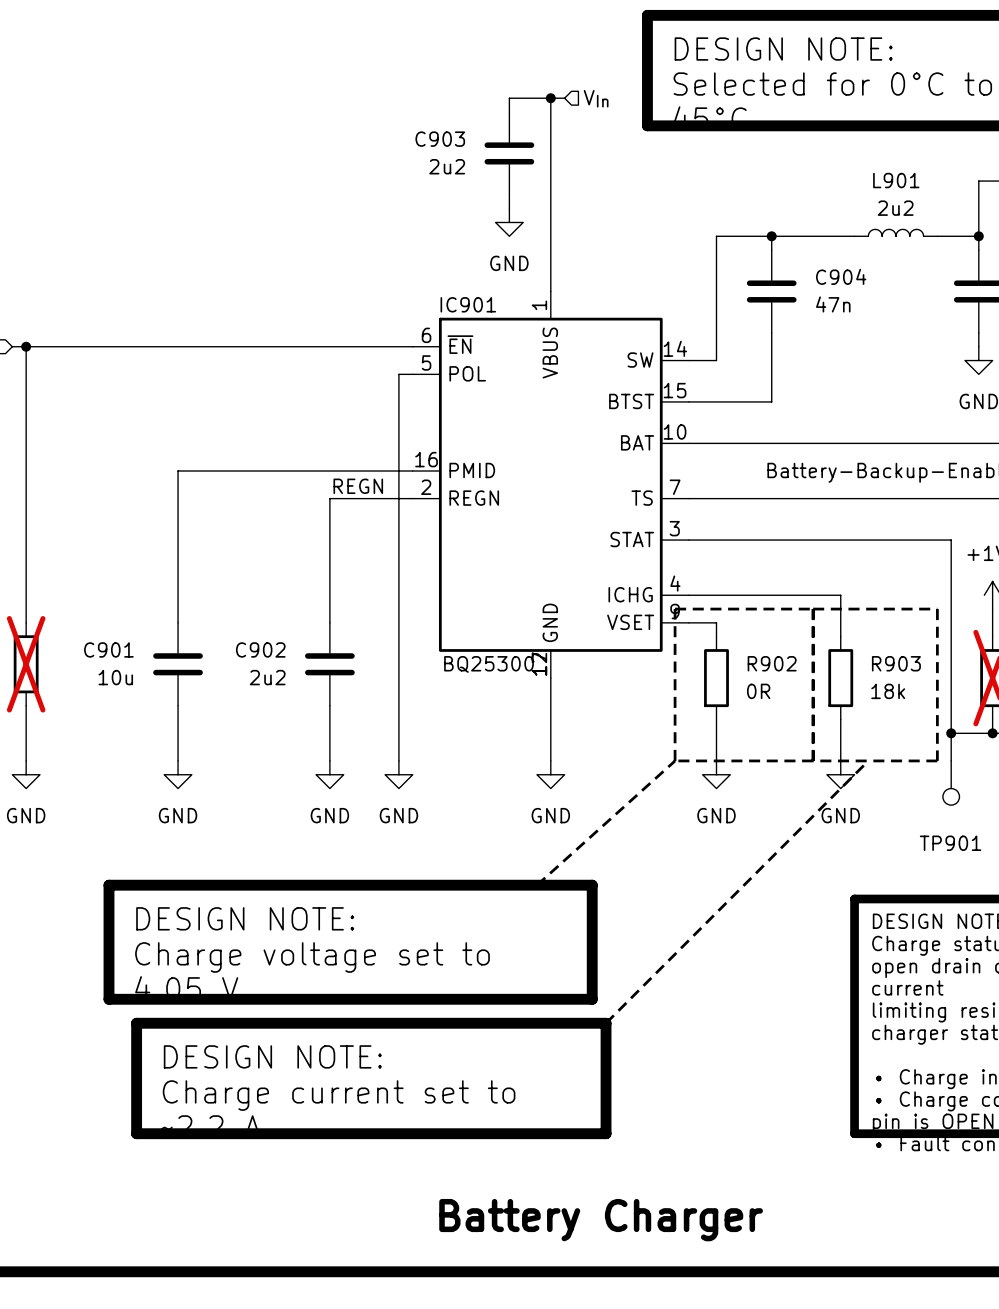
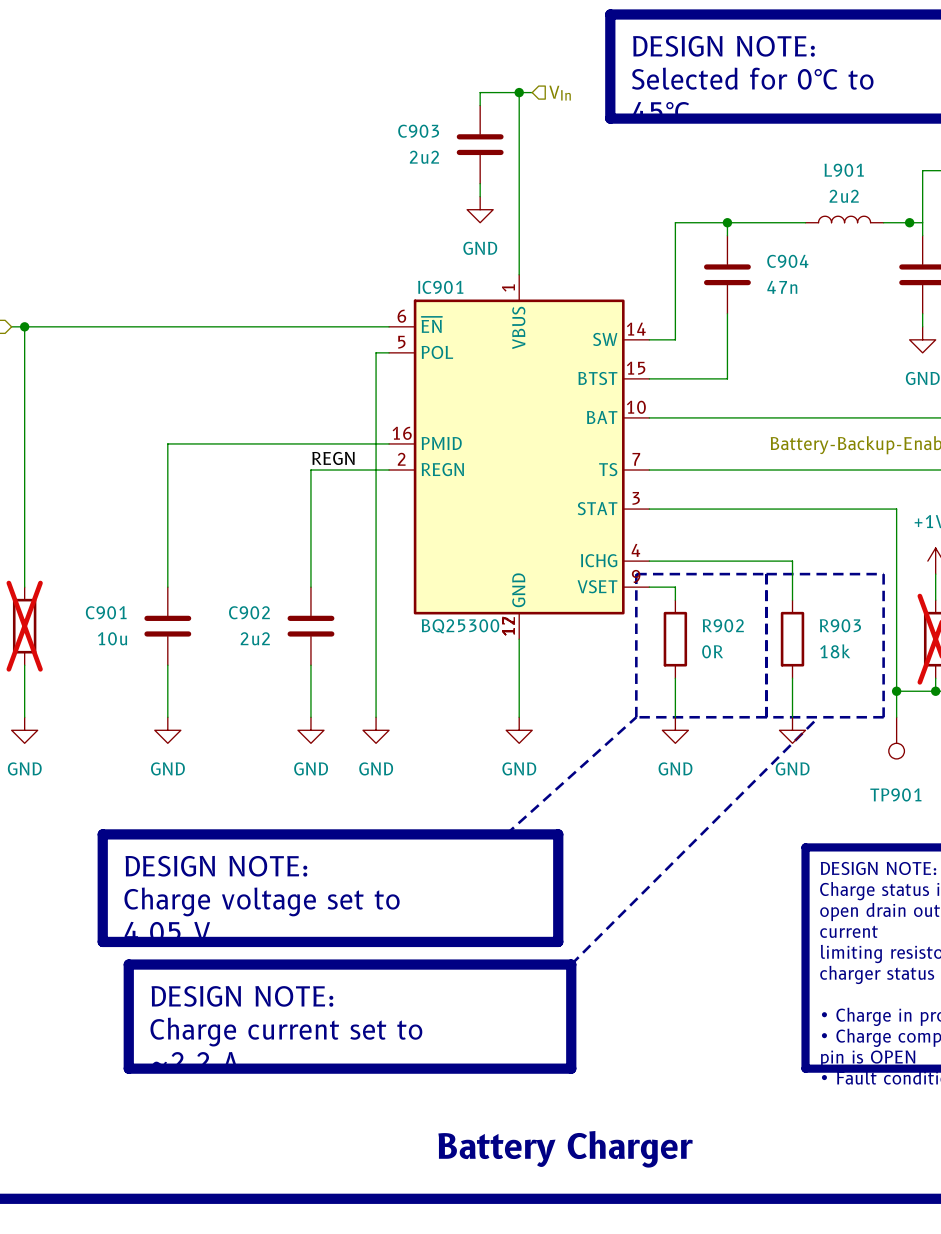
junction position: (978, 236) -> (909, 222)

